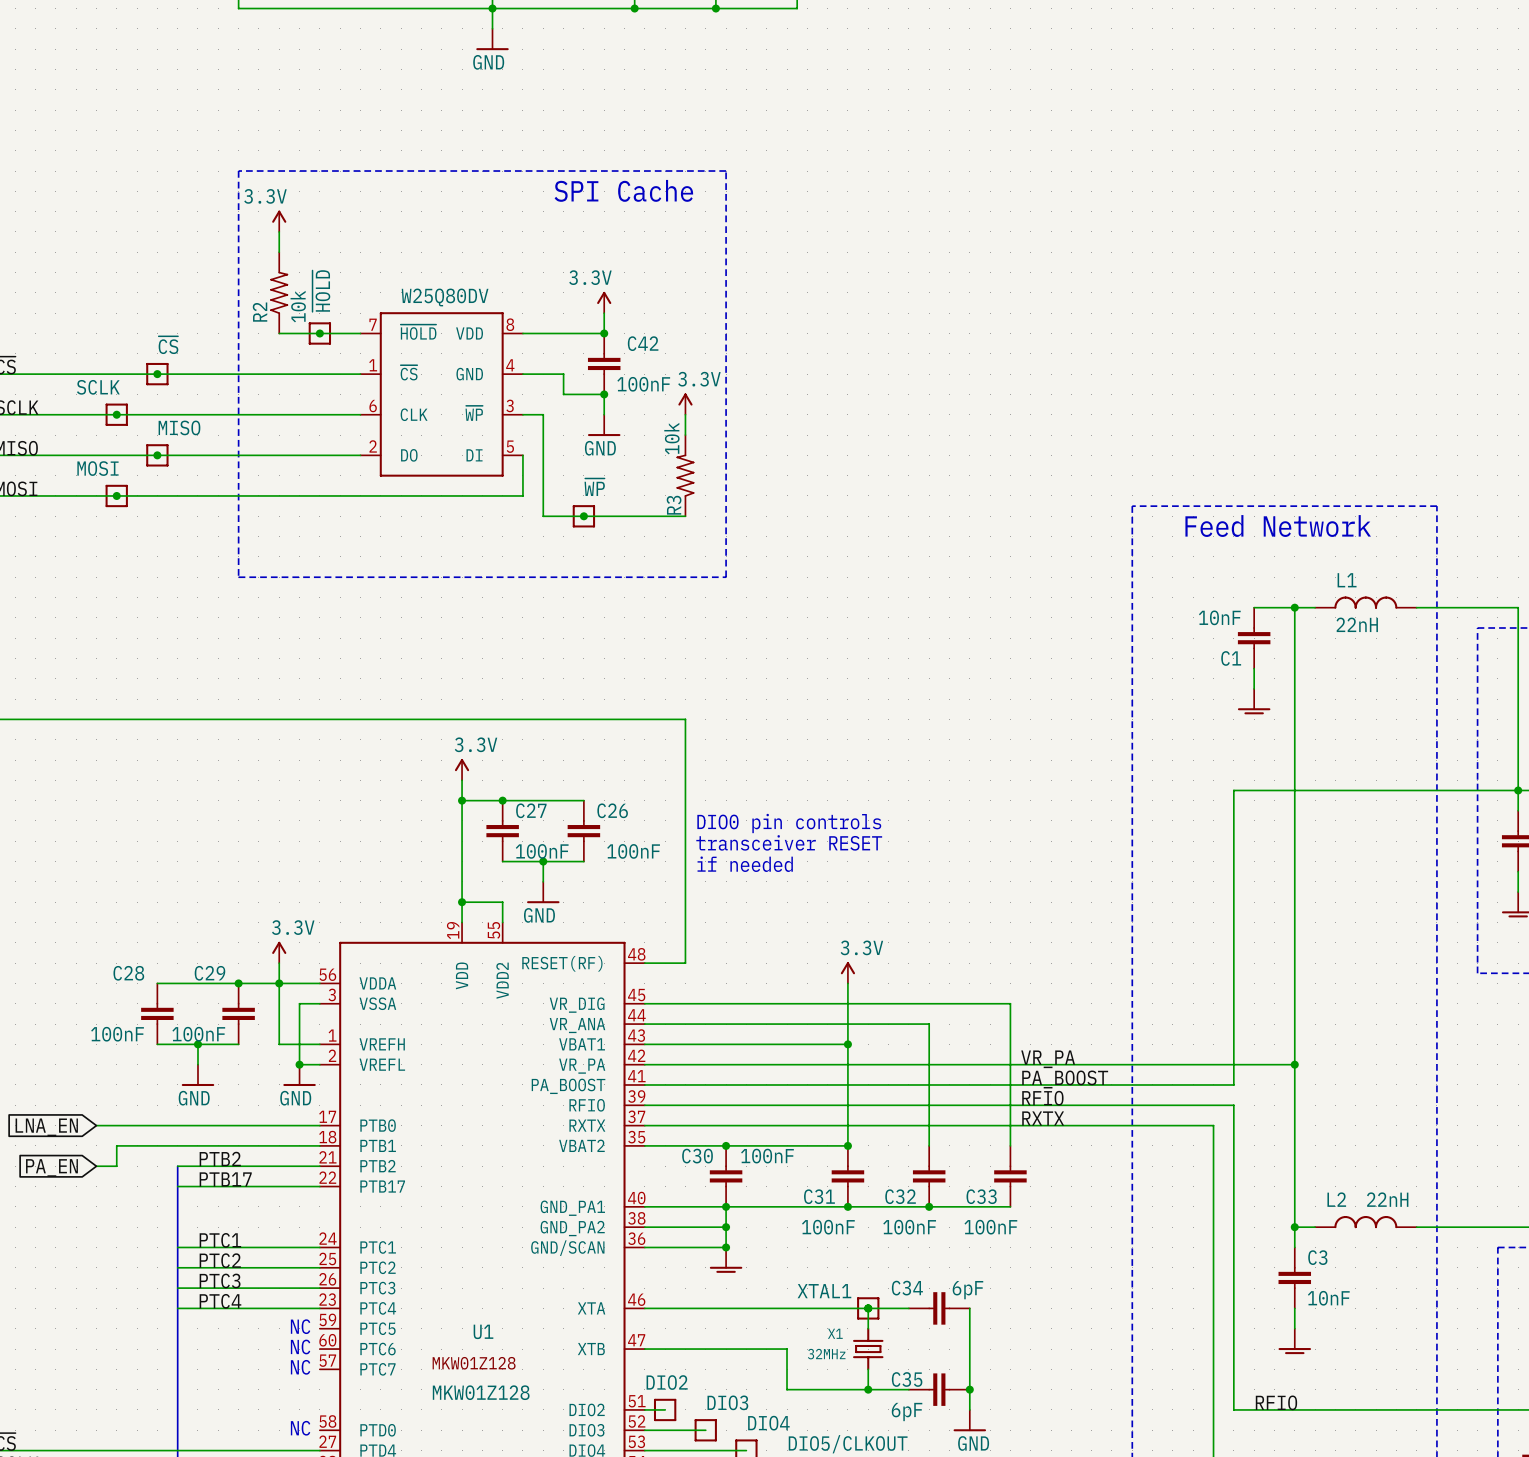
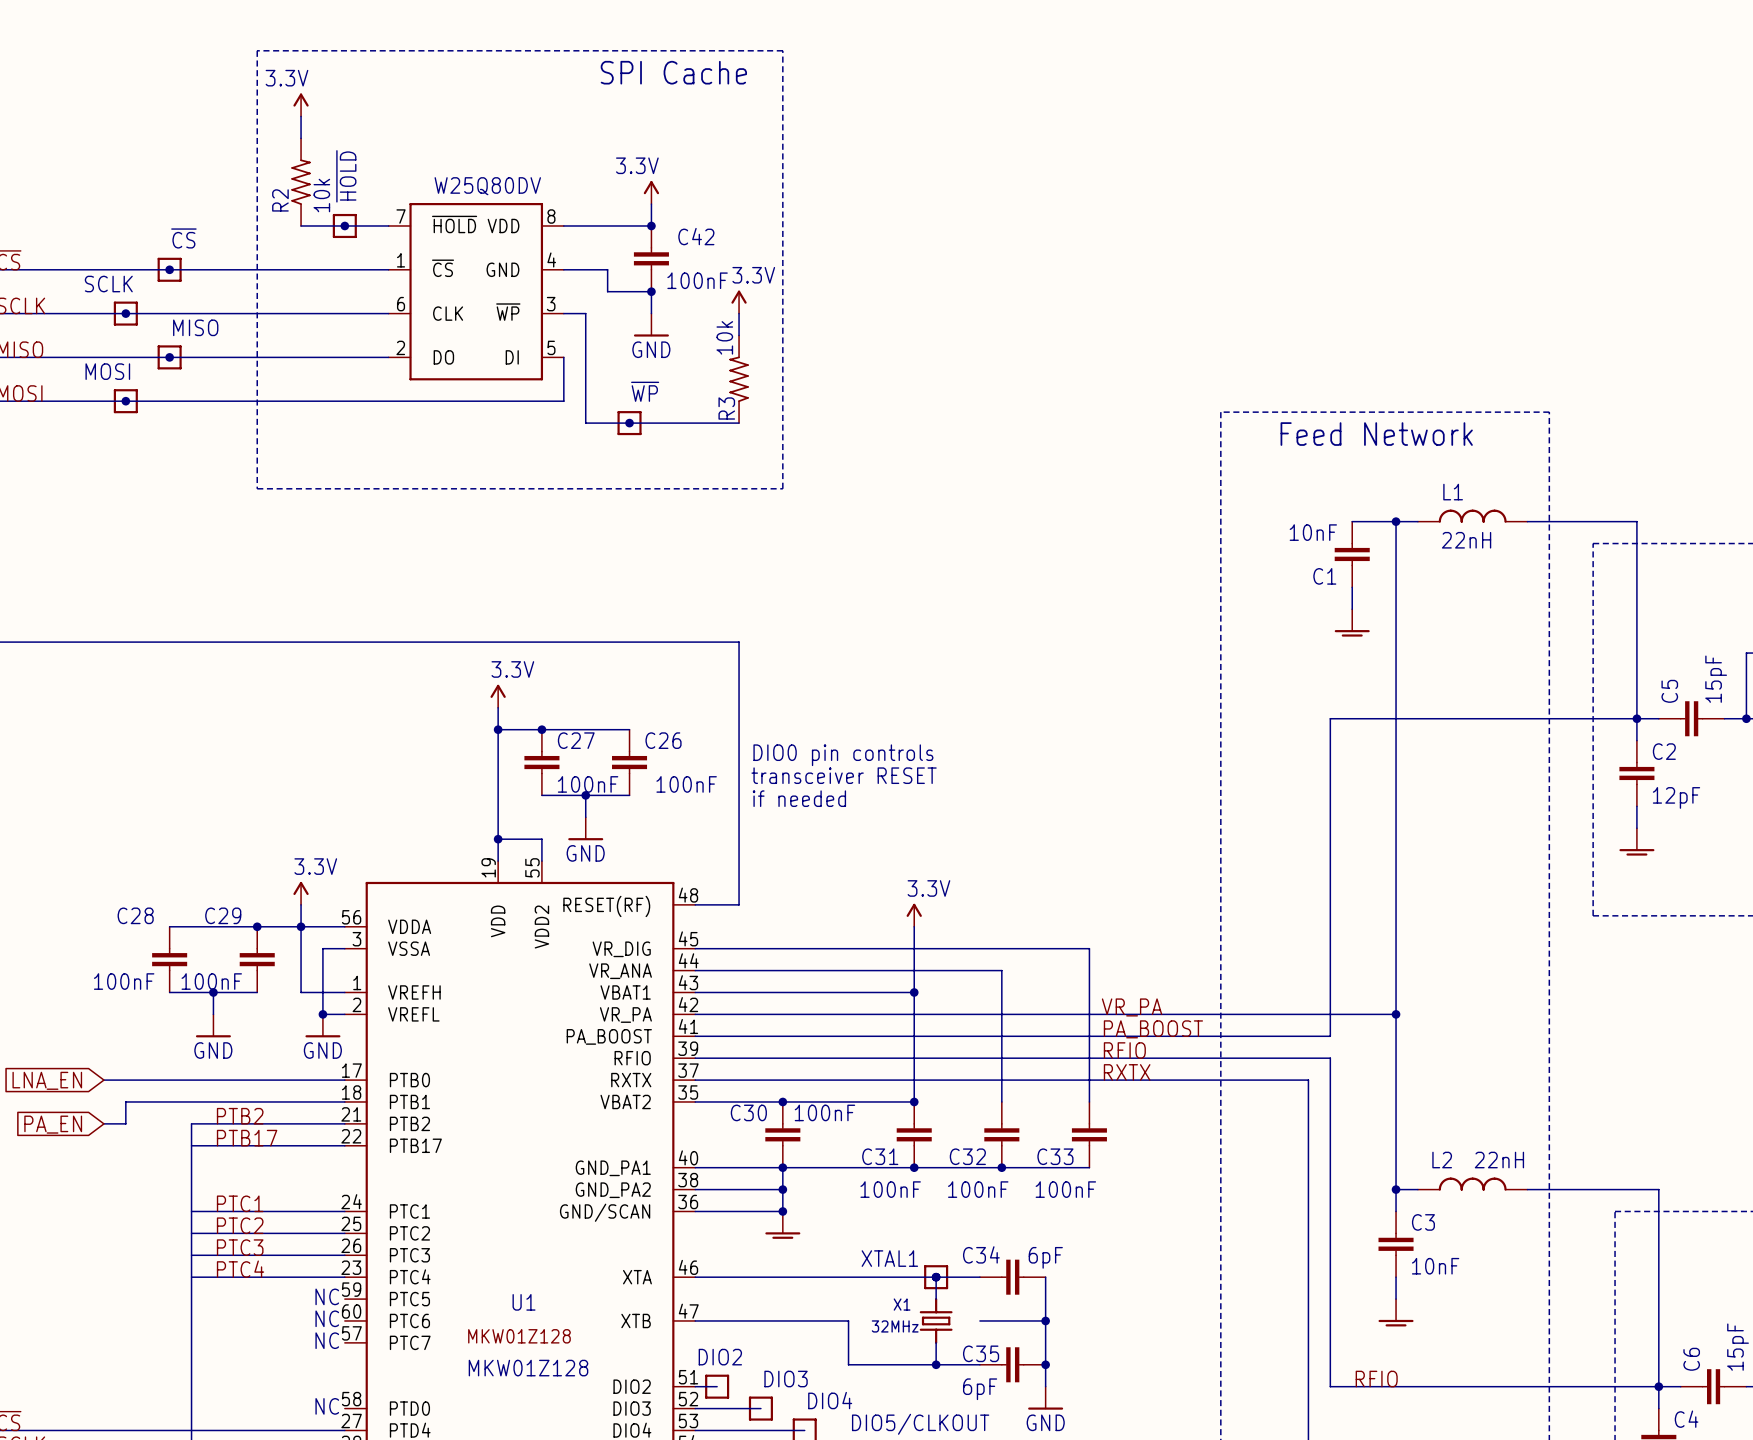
wire: none -> (979, 1320) (1045, 1320)
junction: none -> (1045, 1320)

